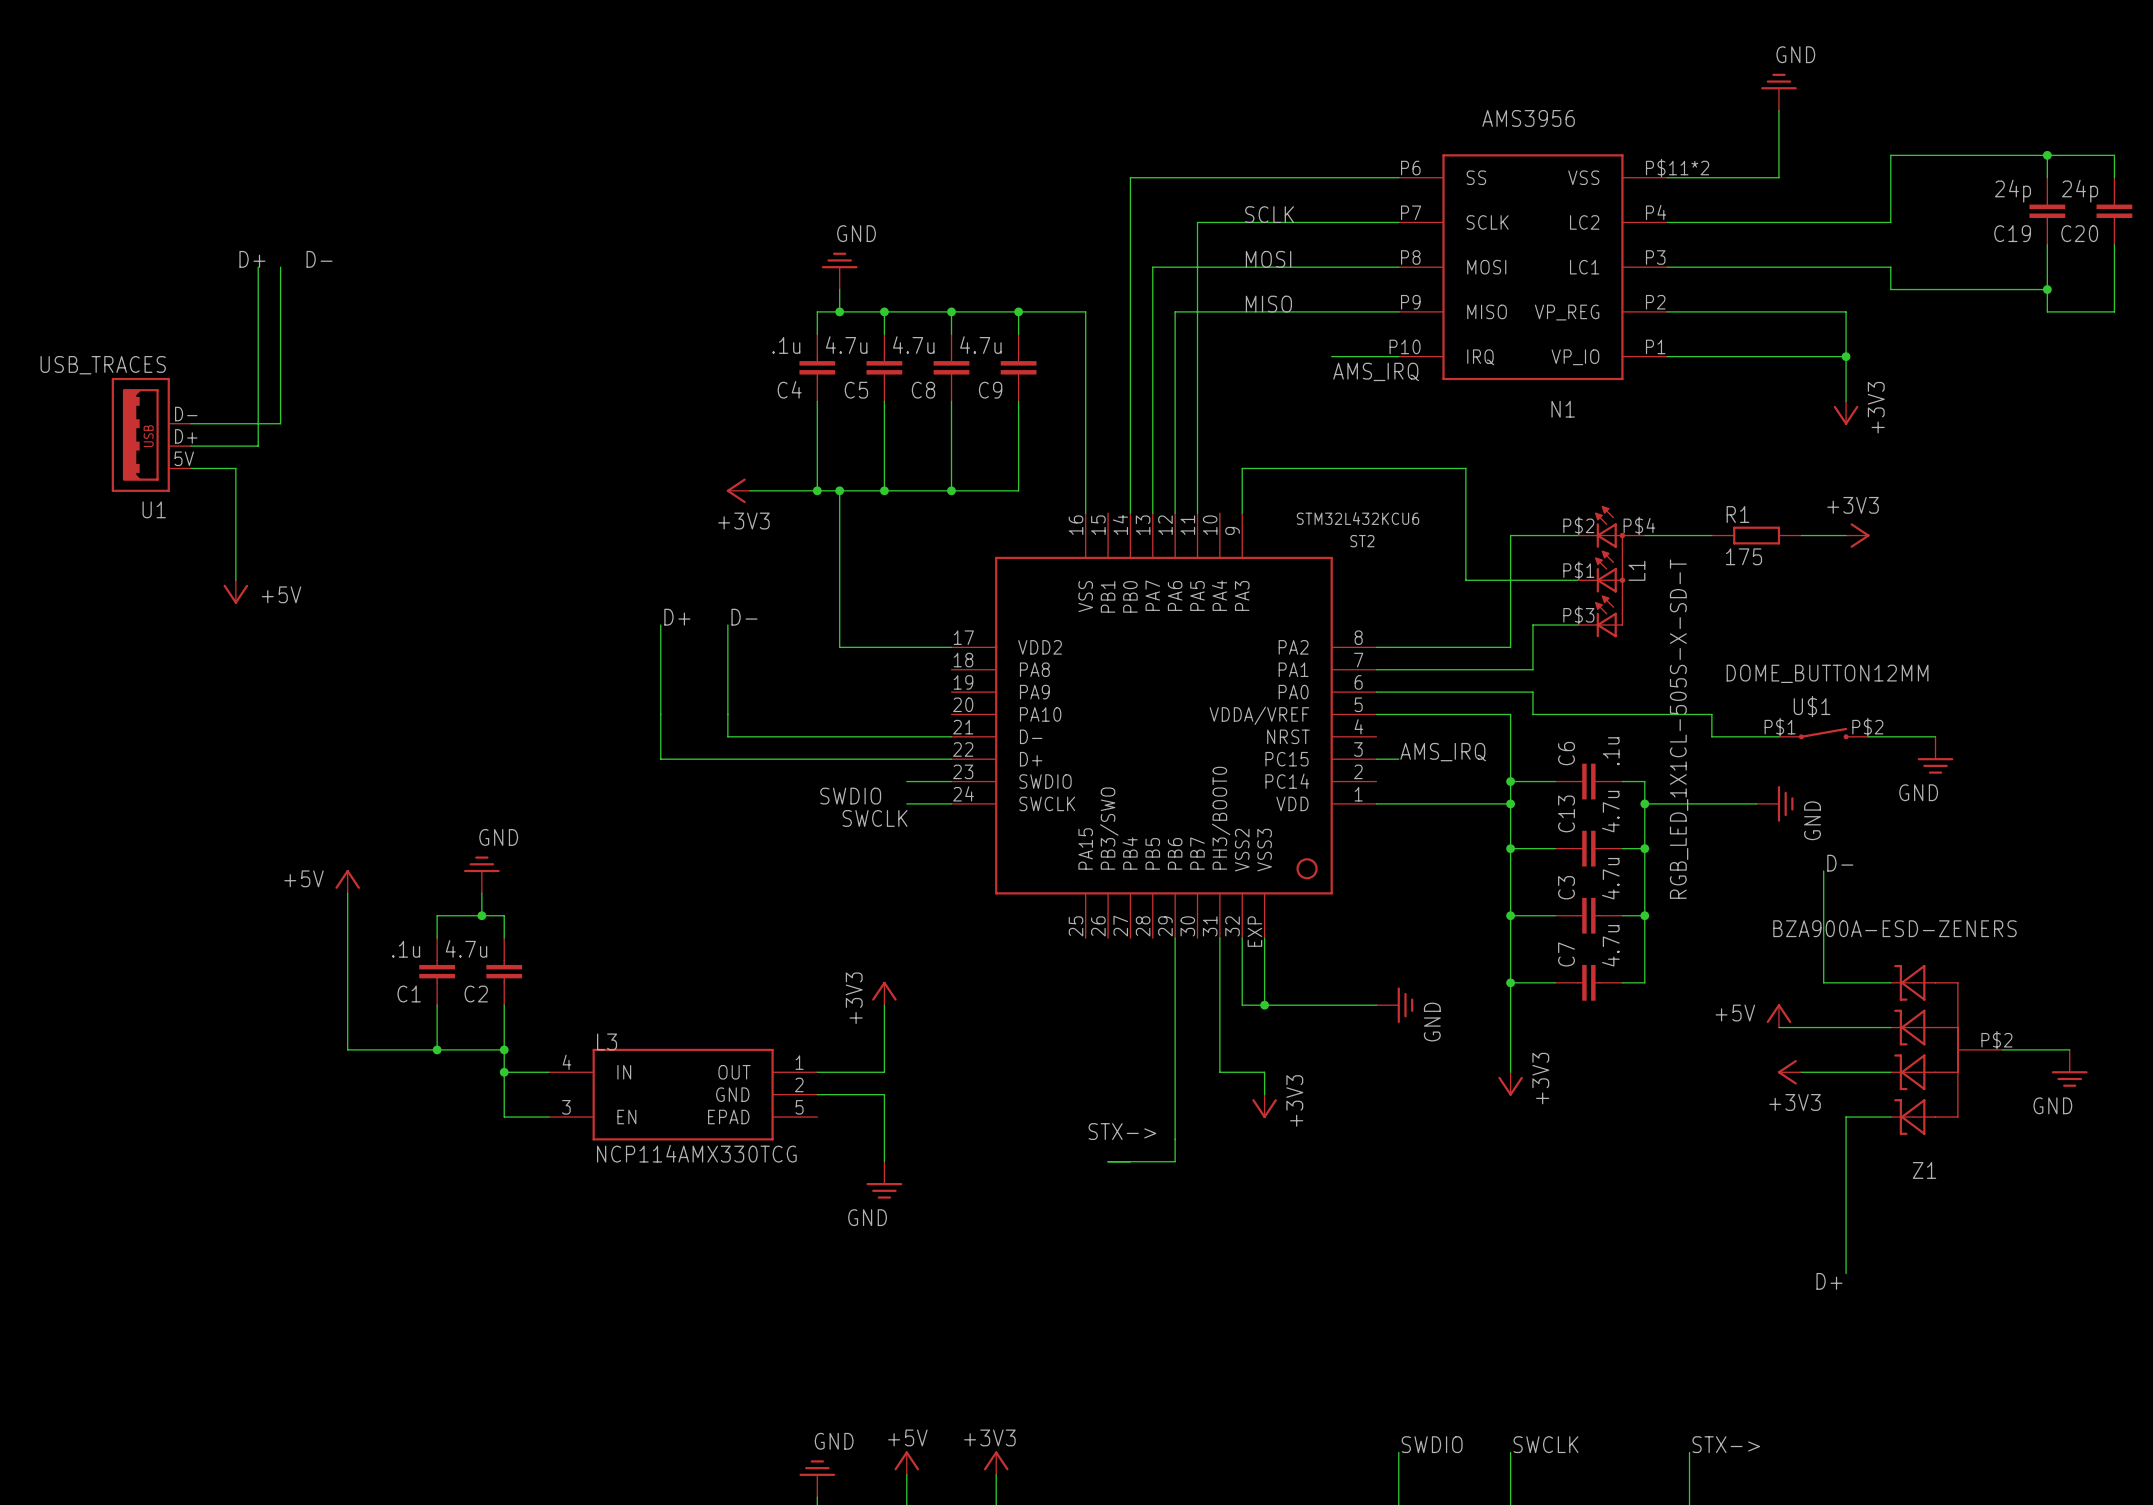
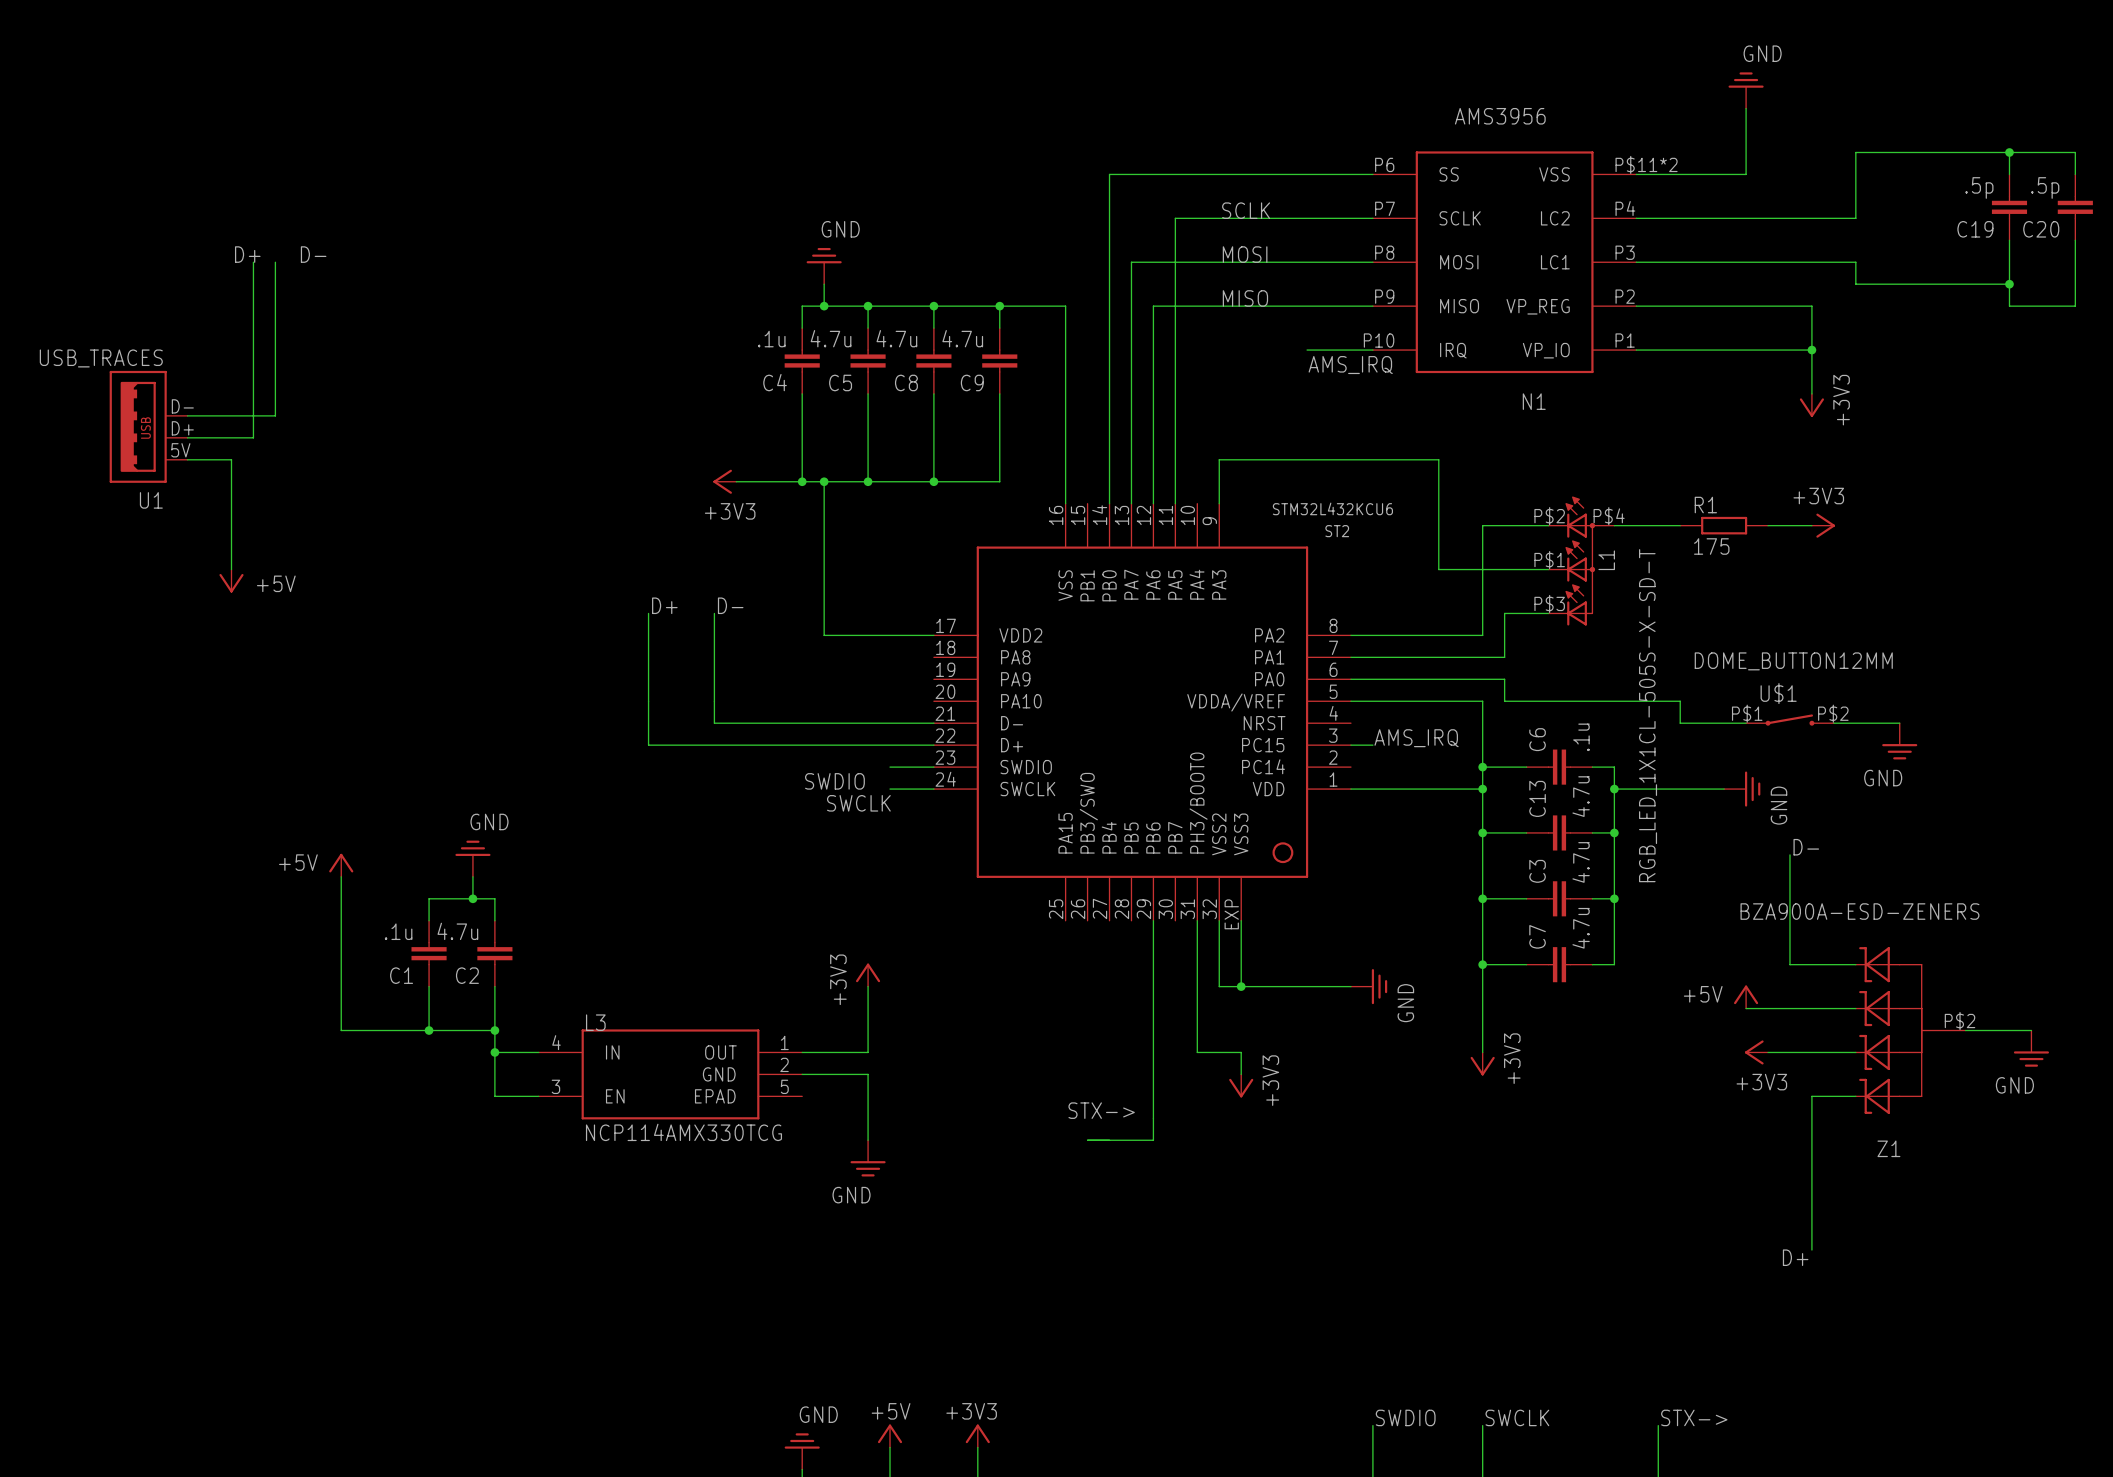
C19 value: 24p (2012, 191) -> .5p (1979, 187)
C20 value: 24p (2080, 191) -> .5p (2045, 187)

